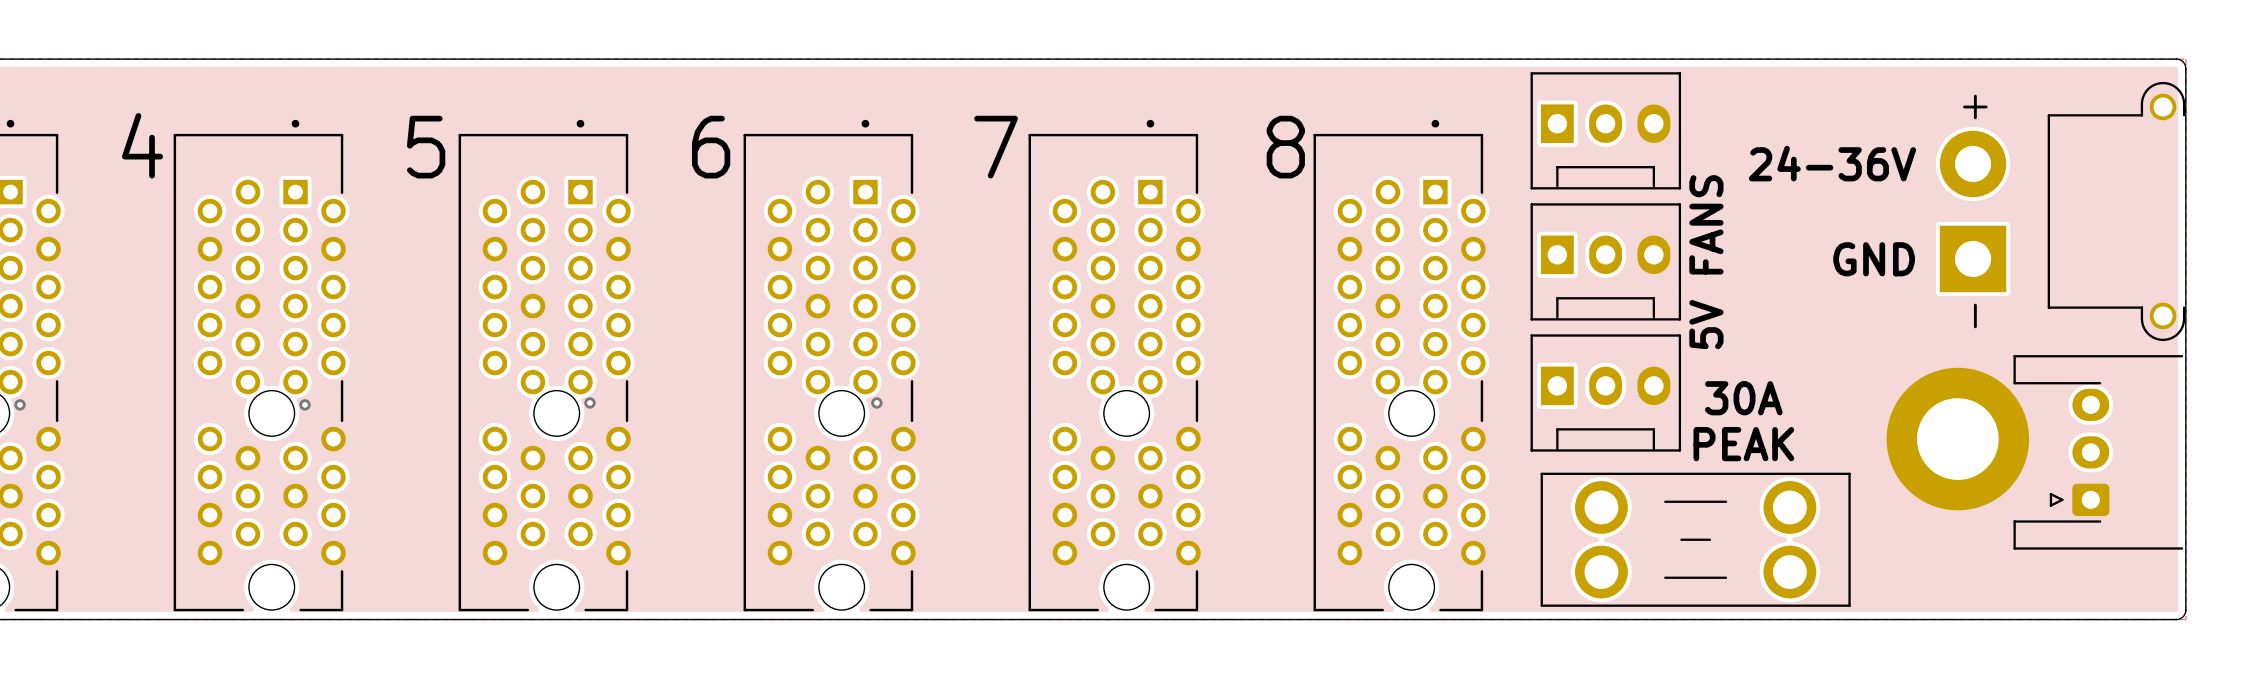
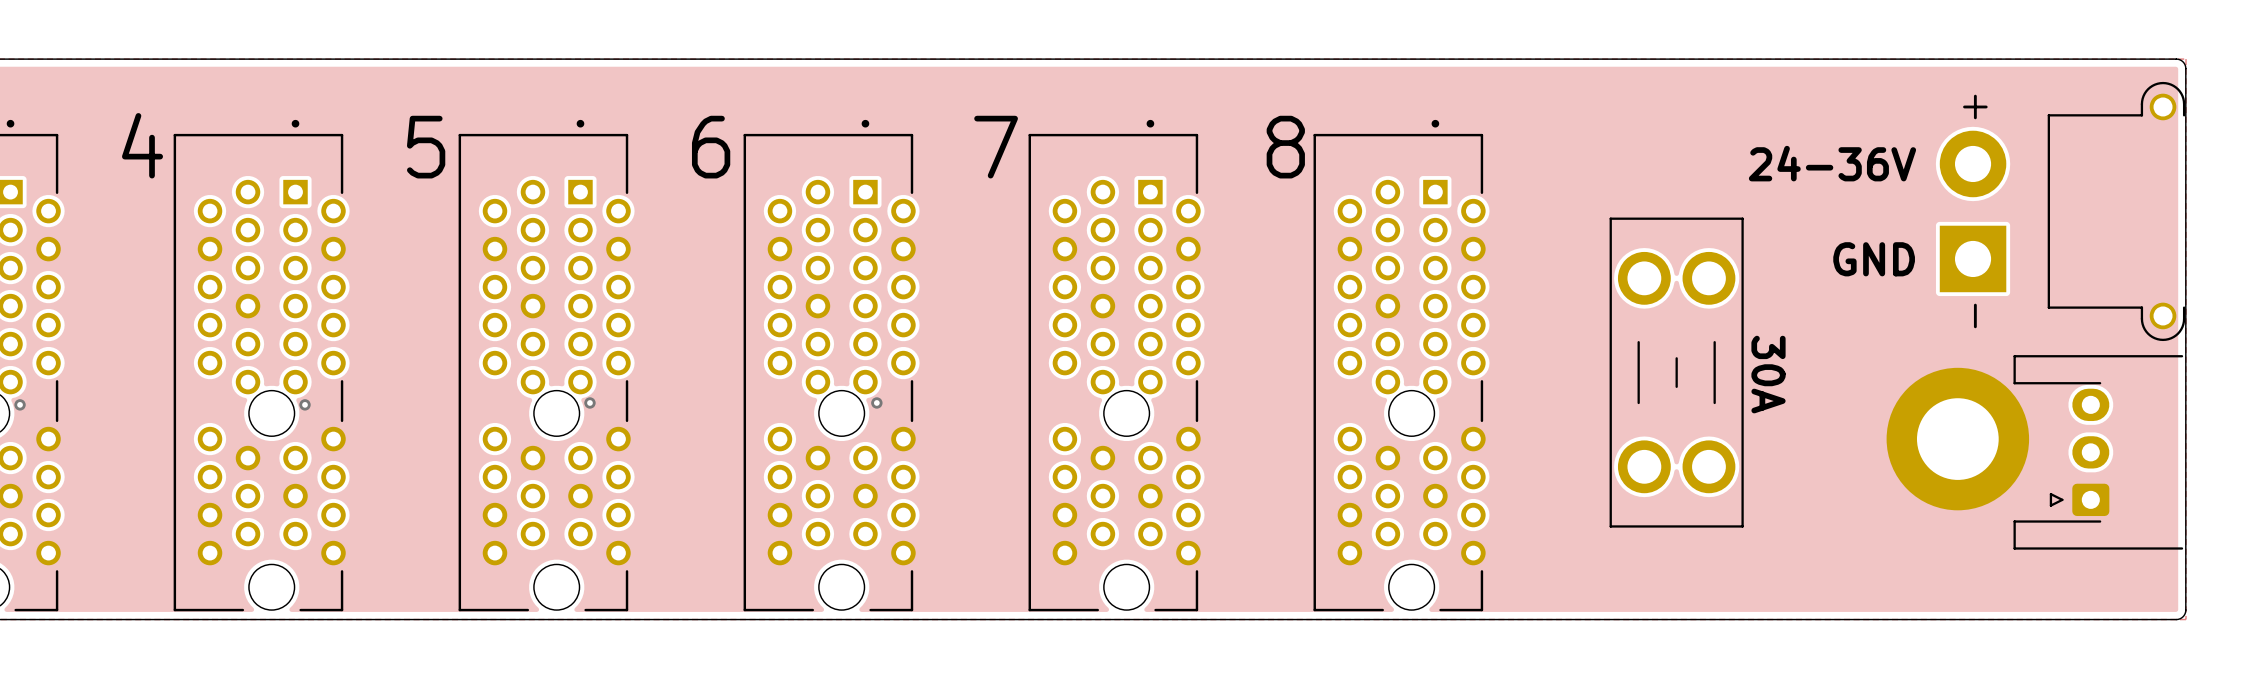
part: (1605, 130) -> none
part: (1605, 261) -> none
text: 5V FANS (1706, 262) -> none
part: (1605, 393) -> none
text rotation: 0° (1743, 398) -> 90° clockwise (1768, 374)
text: PEAK (1743, 444) -> none
part rotation: 0° (1695, 539) -> 90° clockwise (1676, 372)

